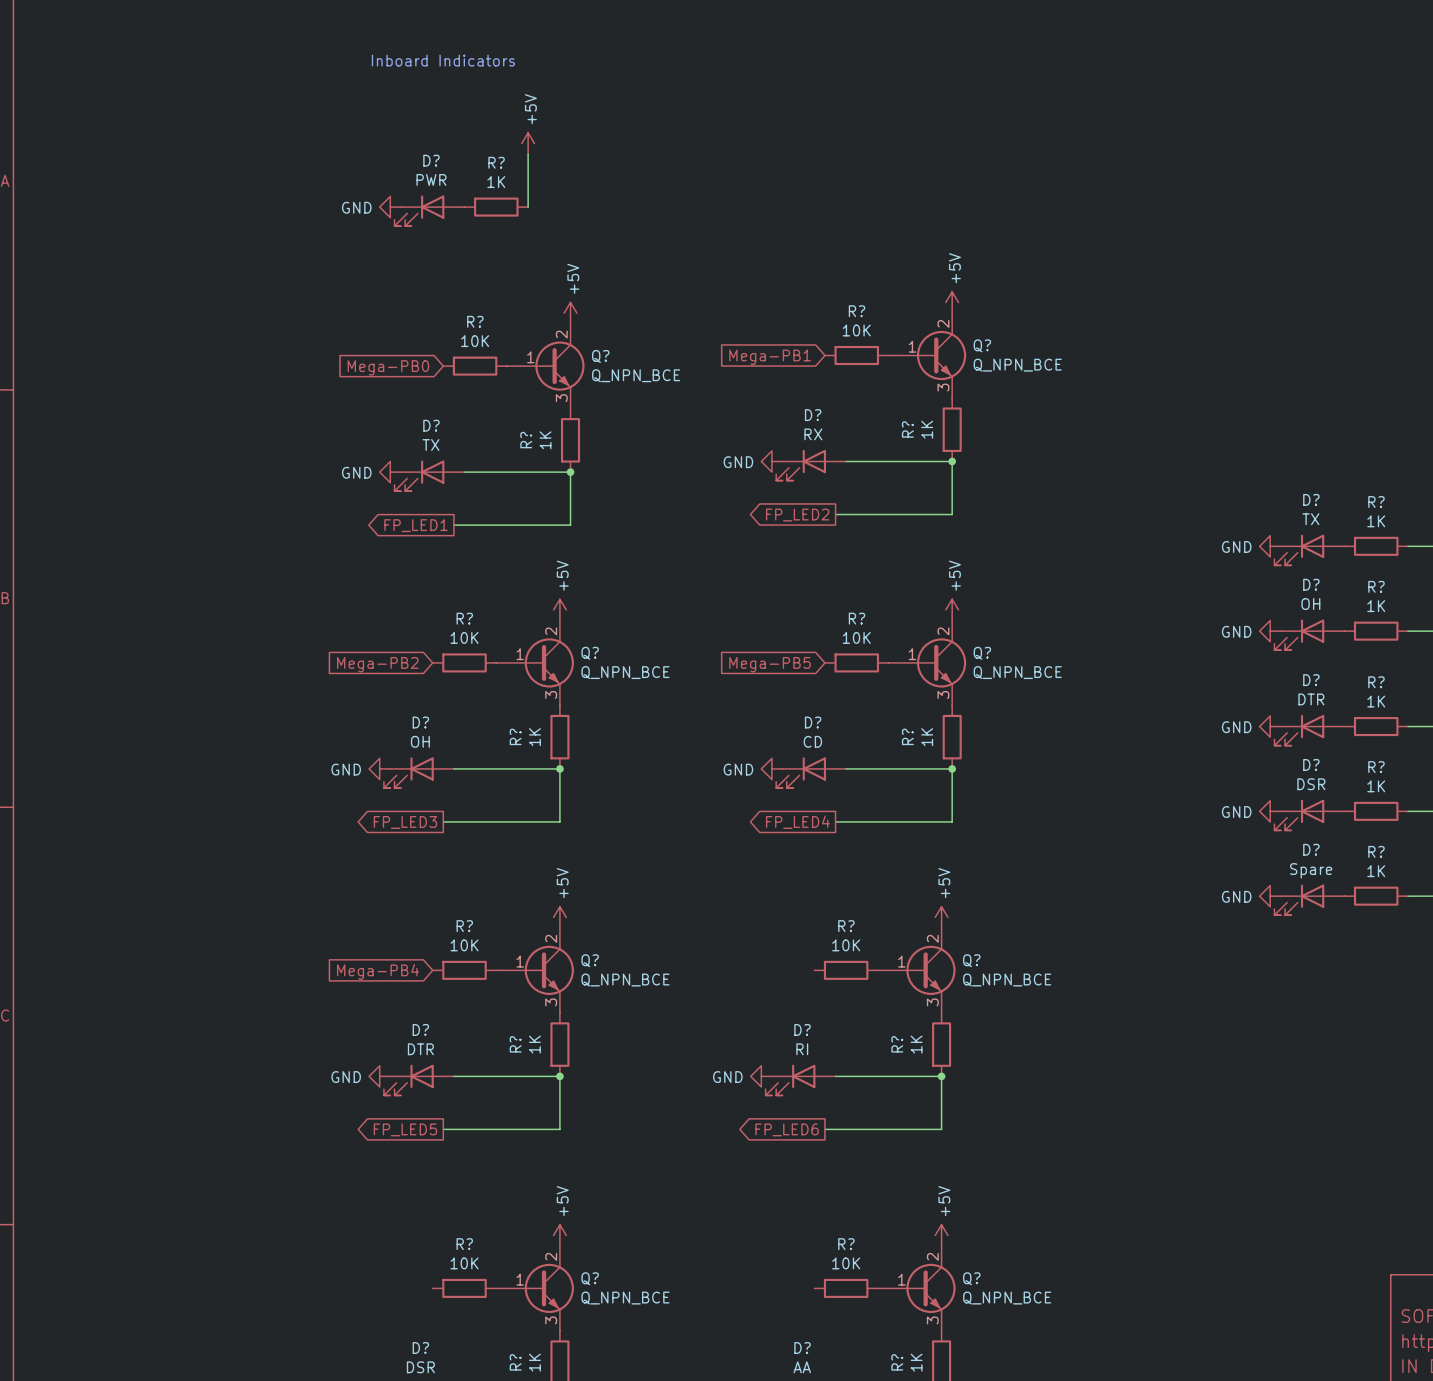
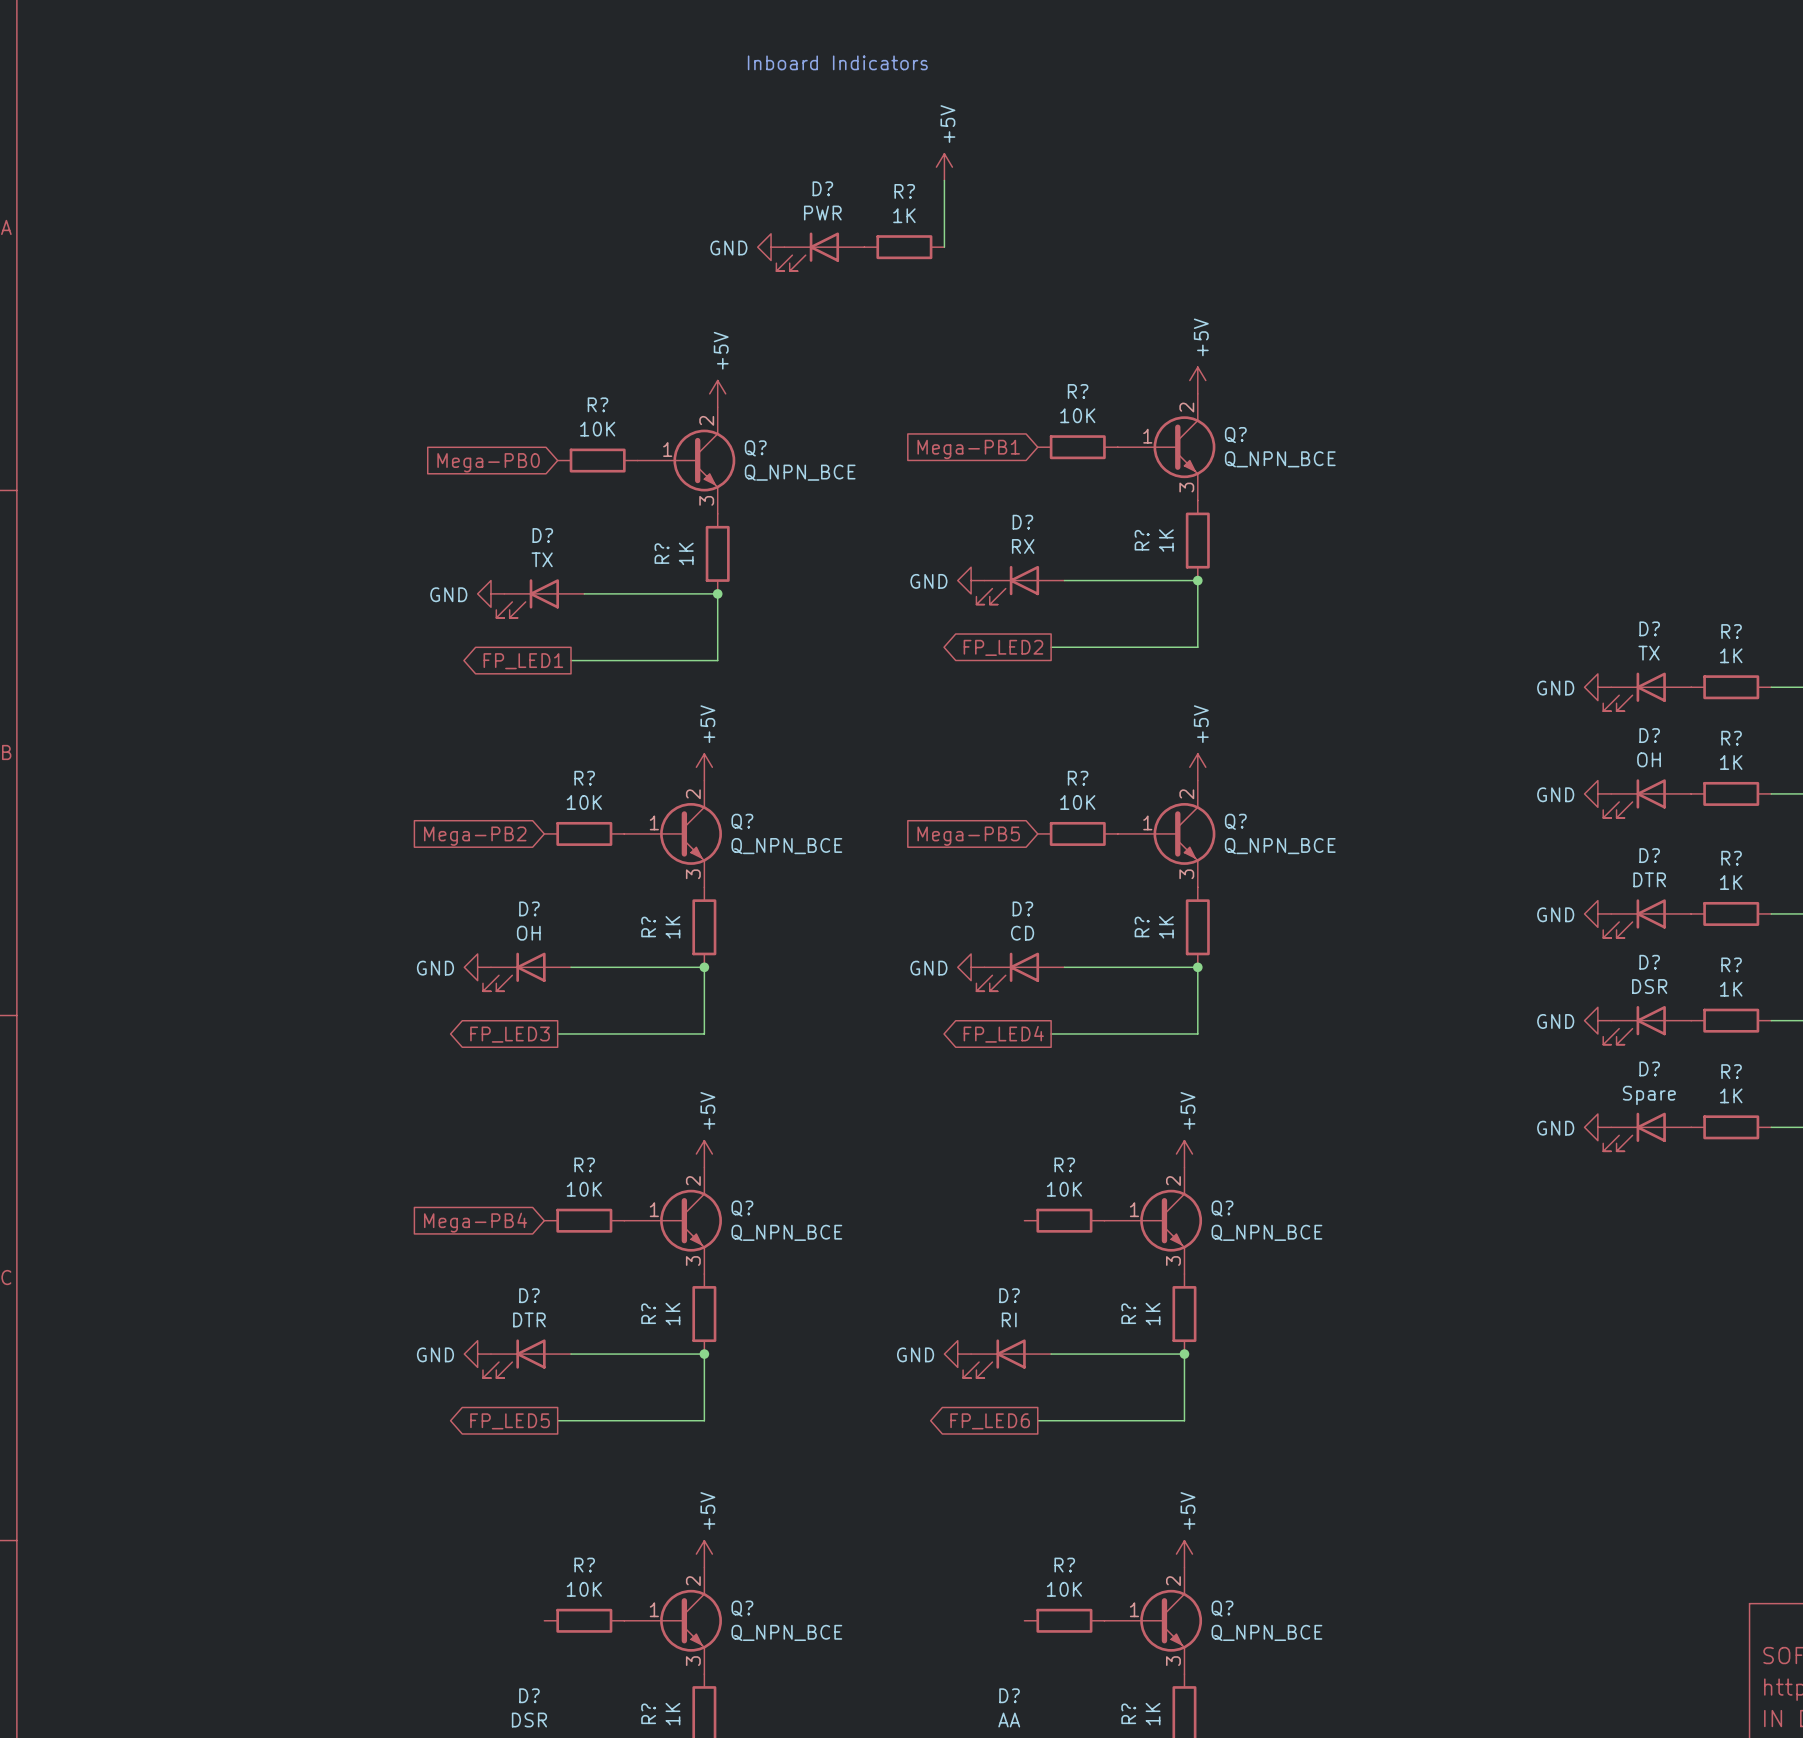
text: none -> Inboard Indicators (837, 62)
text: Inboard Indicators (443, 60) -> none
power symbol: none -> +5V (944, 167)
power symbol: +5V (528, 143) -> none
wire: none -> (944, 180) (944, 247)
wire: (528, 154) (528, 207) -> none
power symbol: none -> GND (771, 247)
R?: none -> 1K (904, 247)
D?: none -> PWR (820, 251)
power symbol: GND (390, 207) -> none
R?: 1K (496, 207) -> none
D?: PWR (429, 210) -> none

